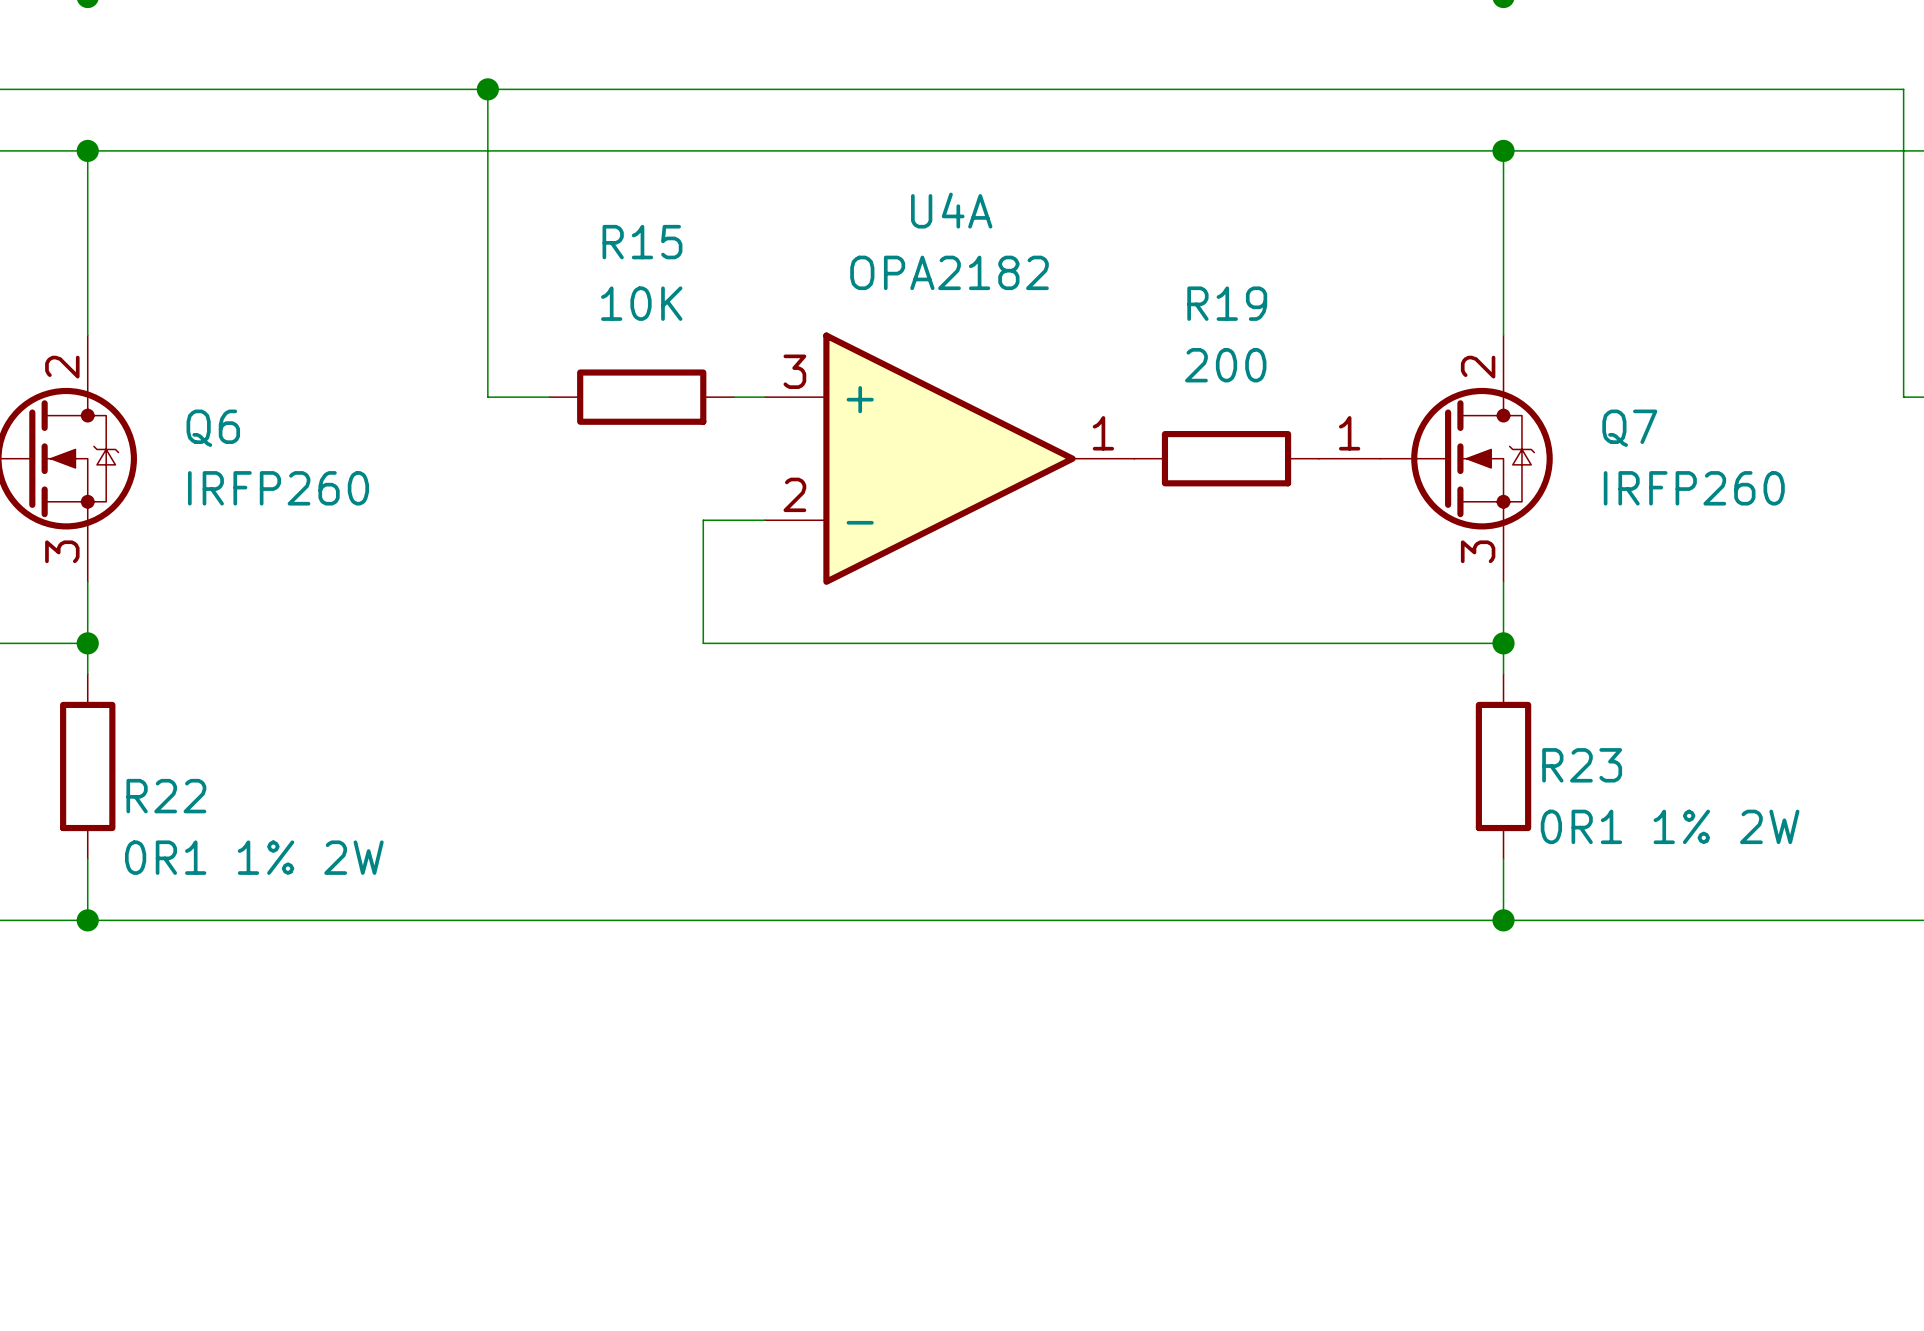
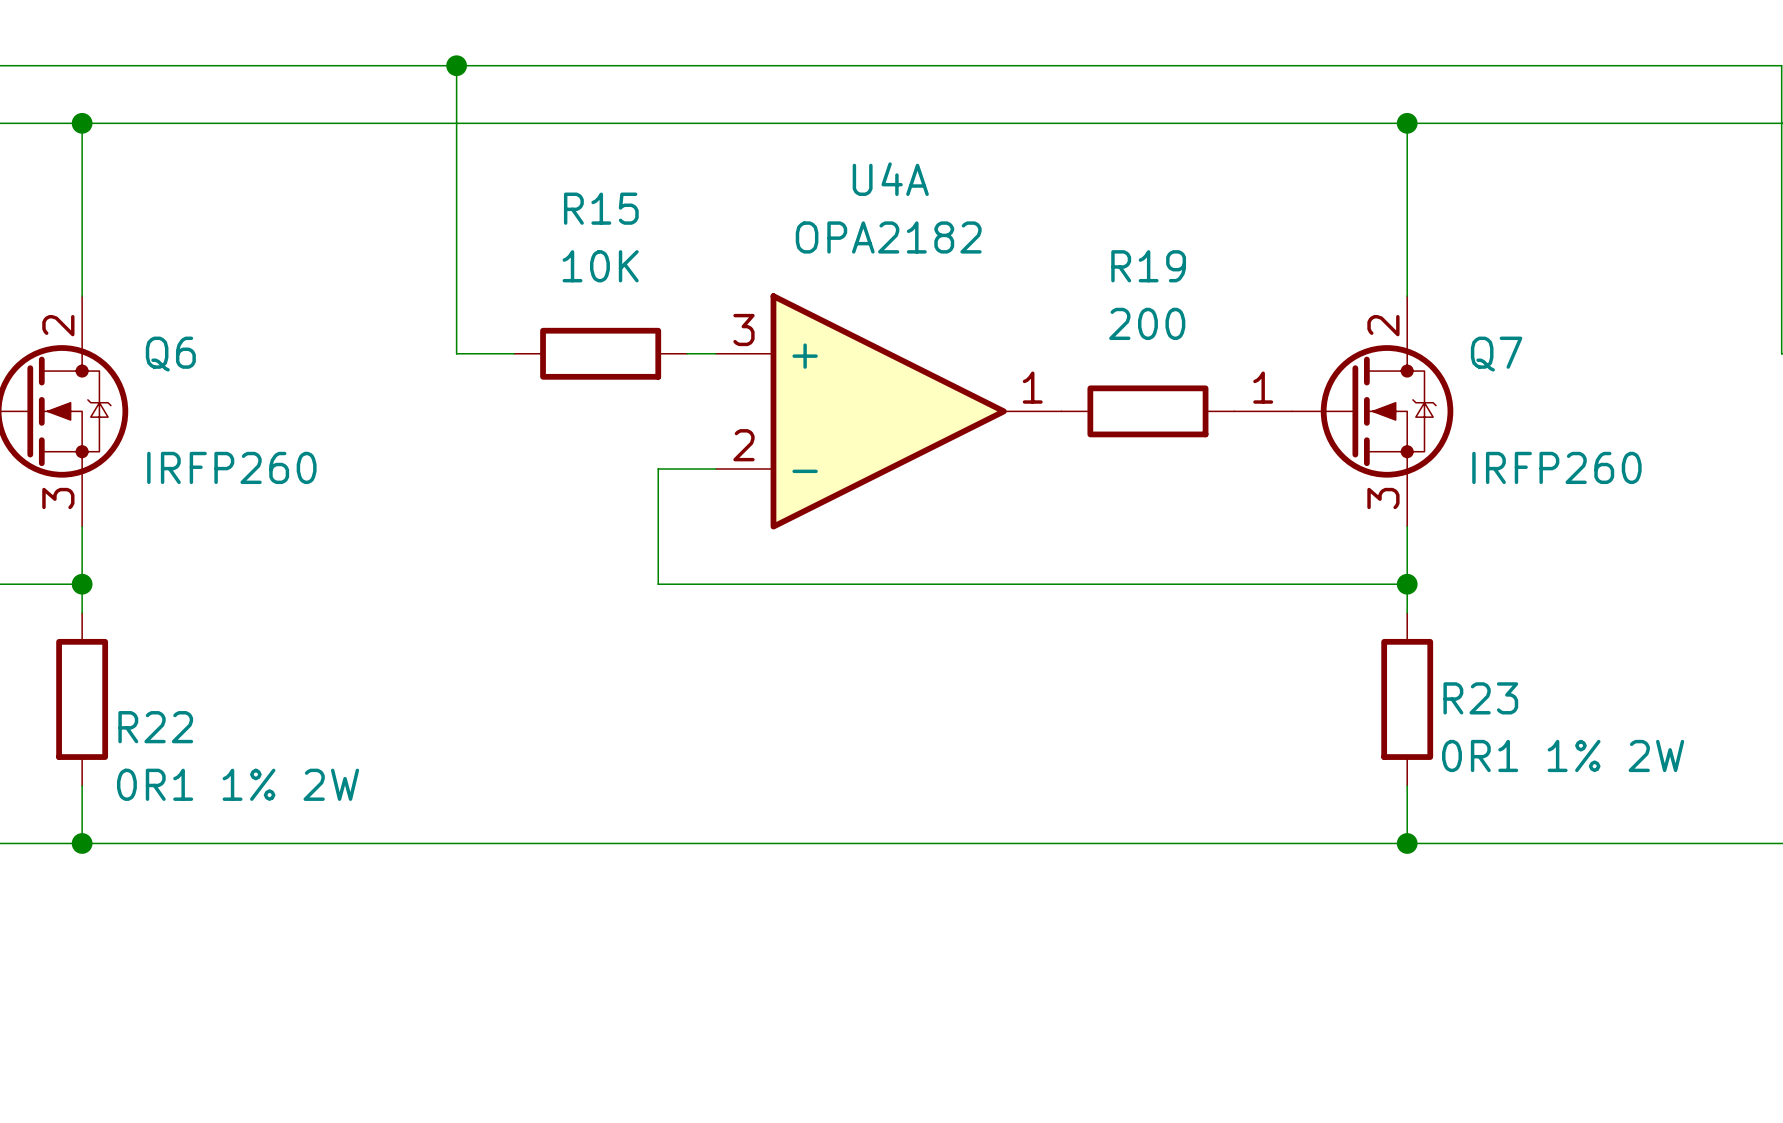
Q6 name position: Q6 (213, 428) -> Q6 (170, 354)
Q7 name position: Q7 (1629, 428) -> Q7 (1496, 354)
Q6 value position: IRFP260 (278, 488) -> IRFP260 (231, 467)
Q7 value position: IRFP260 (1694, 488) -> IRFP260 (1556, 467)

